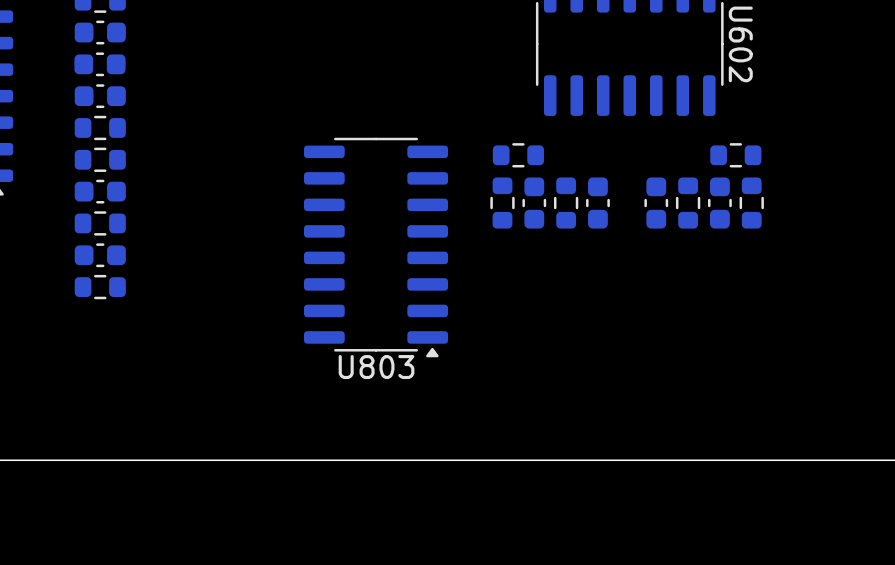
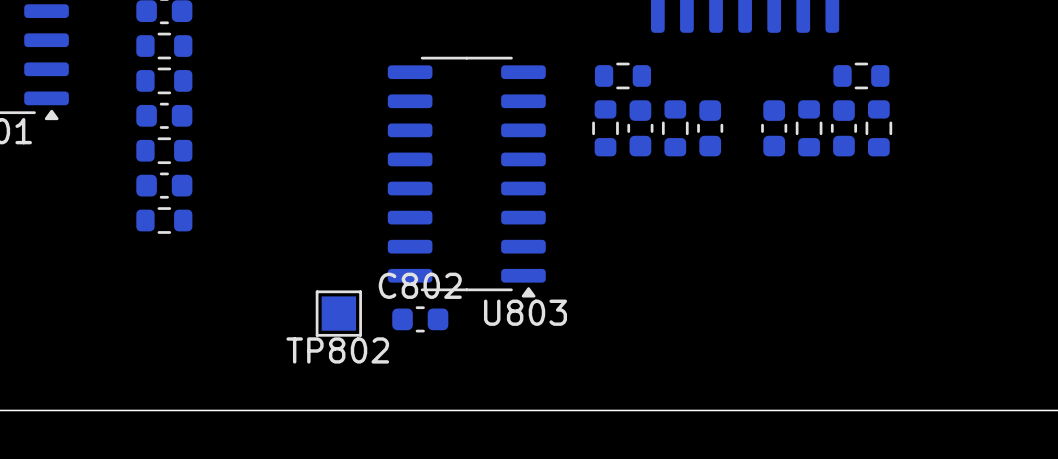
U803 name position: U803 (376, 367) -> U803 (525, 312)
TP802: none -> (338, 313)
C802: none -> (420, 319)

